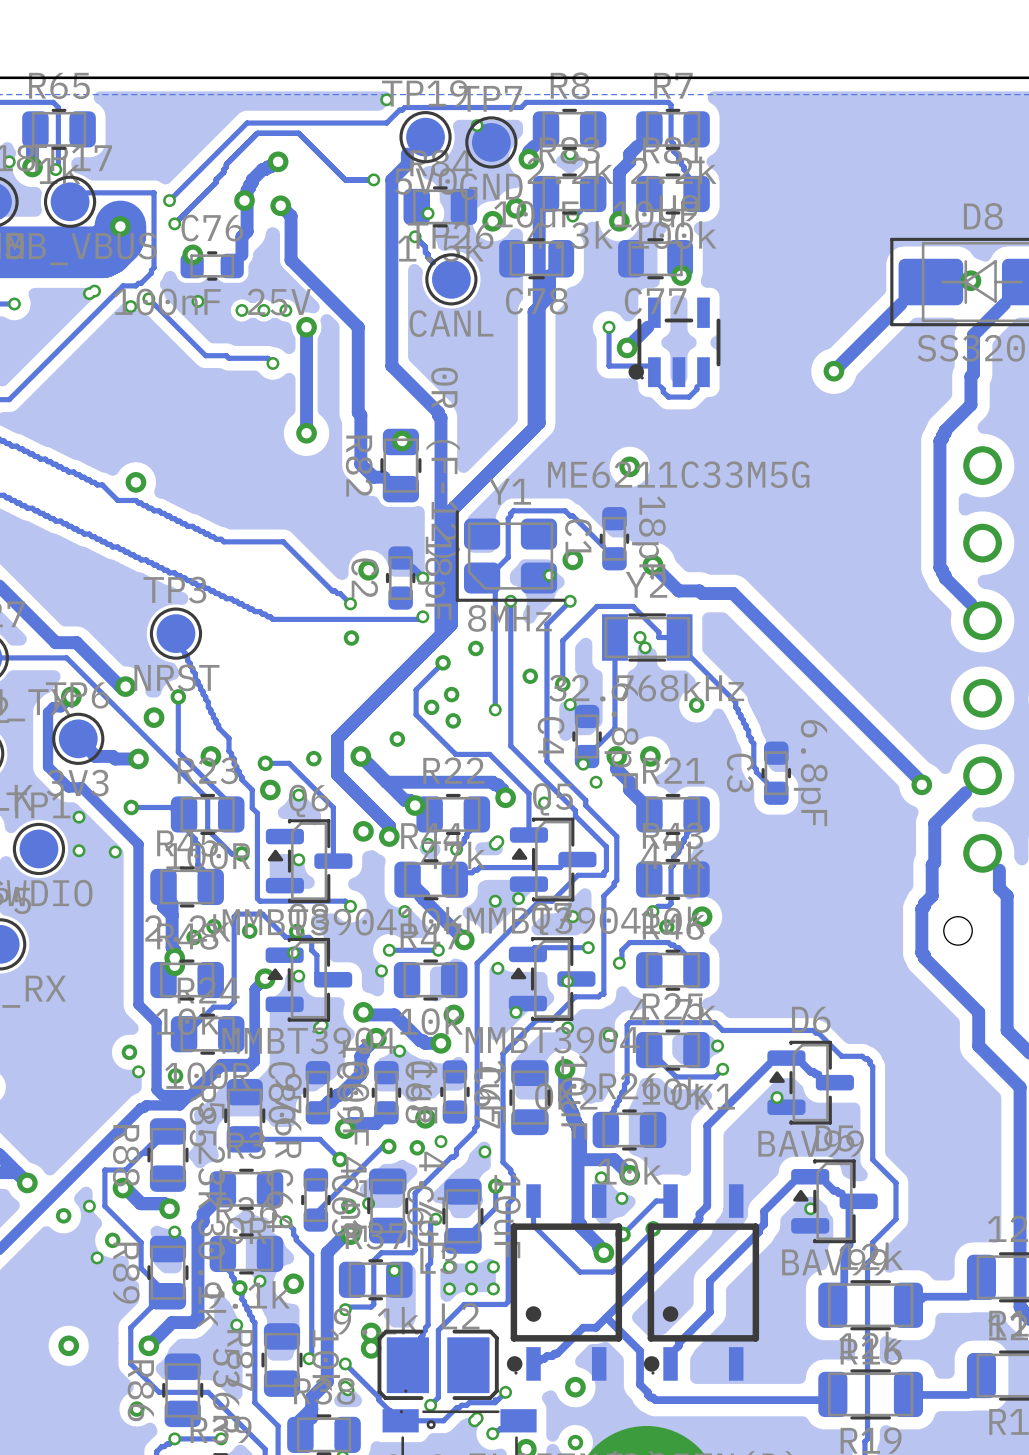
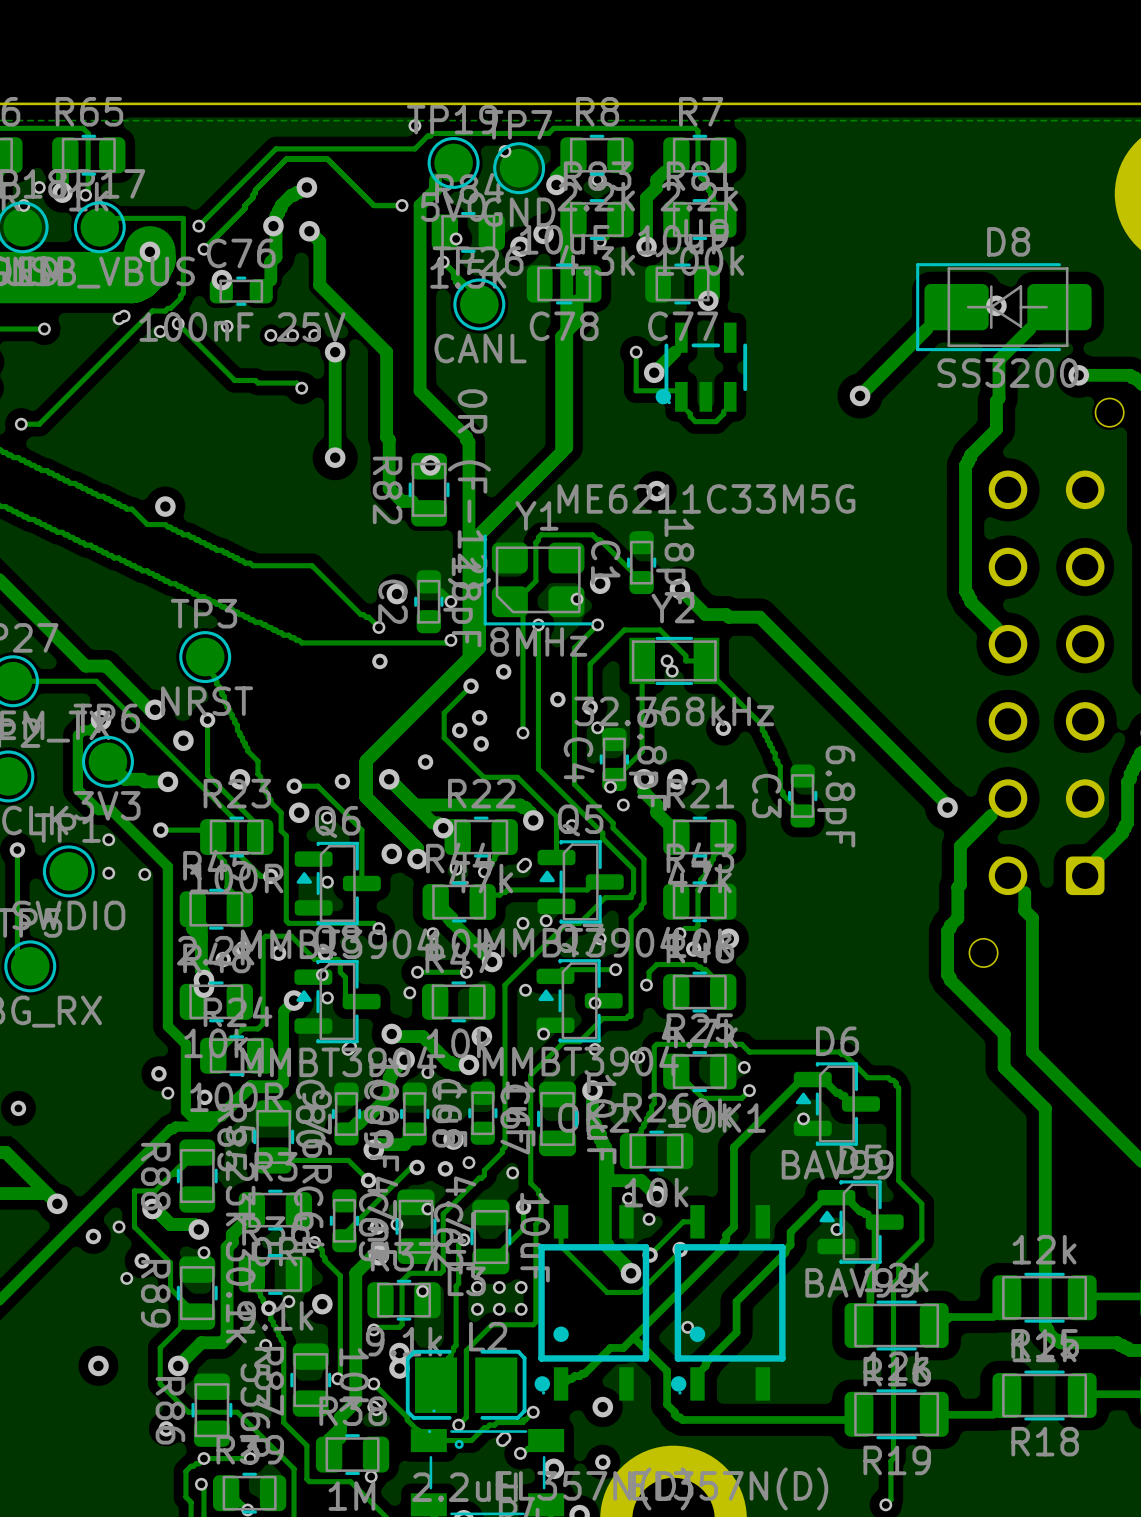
track: none -> (453, 272) (468, 287)
via: none -> (427, 1208)
via: none -> (687, 1327)

